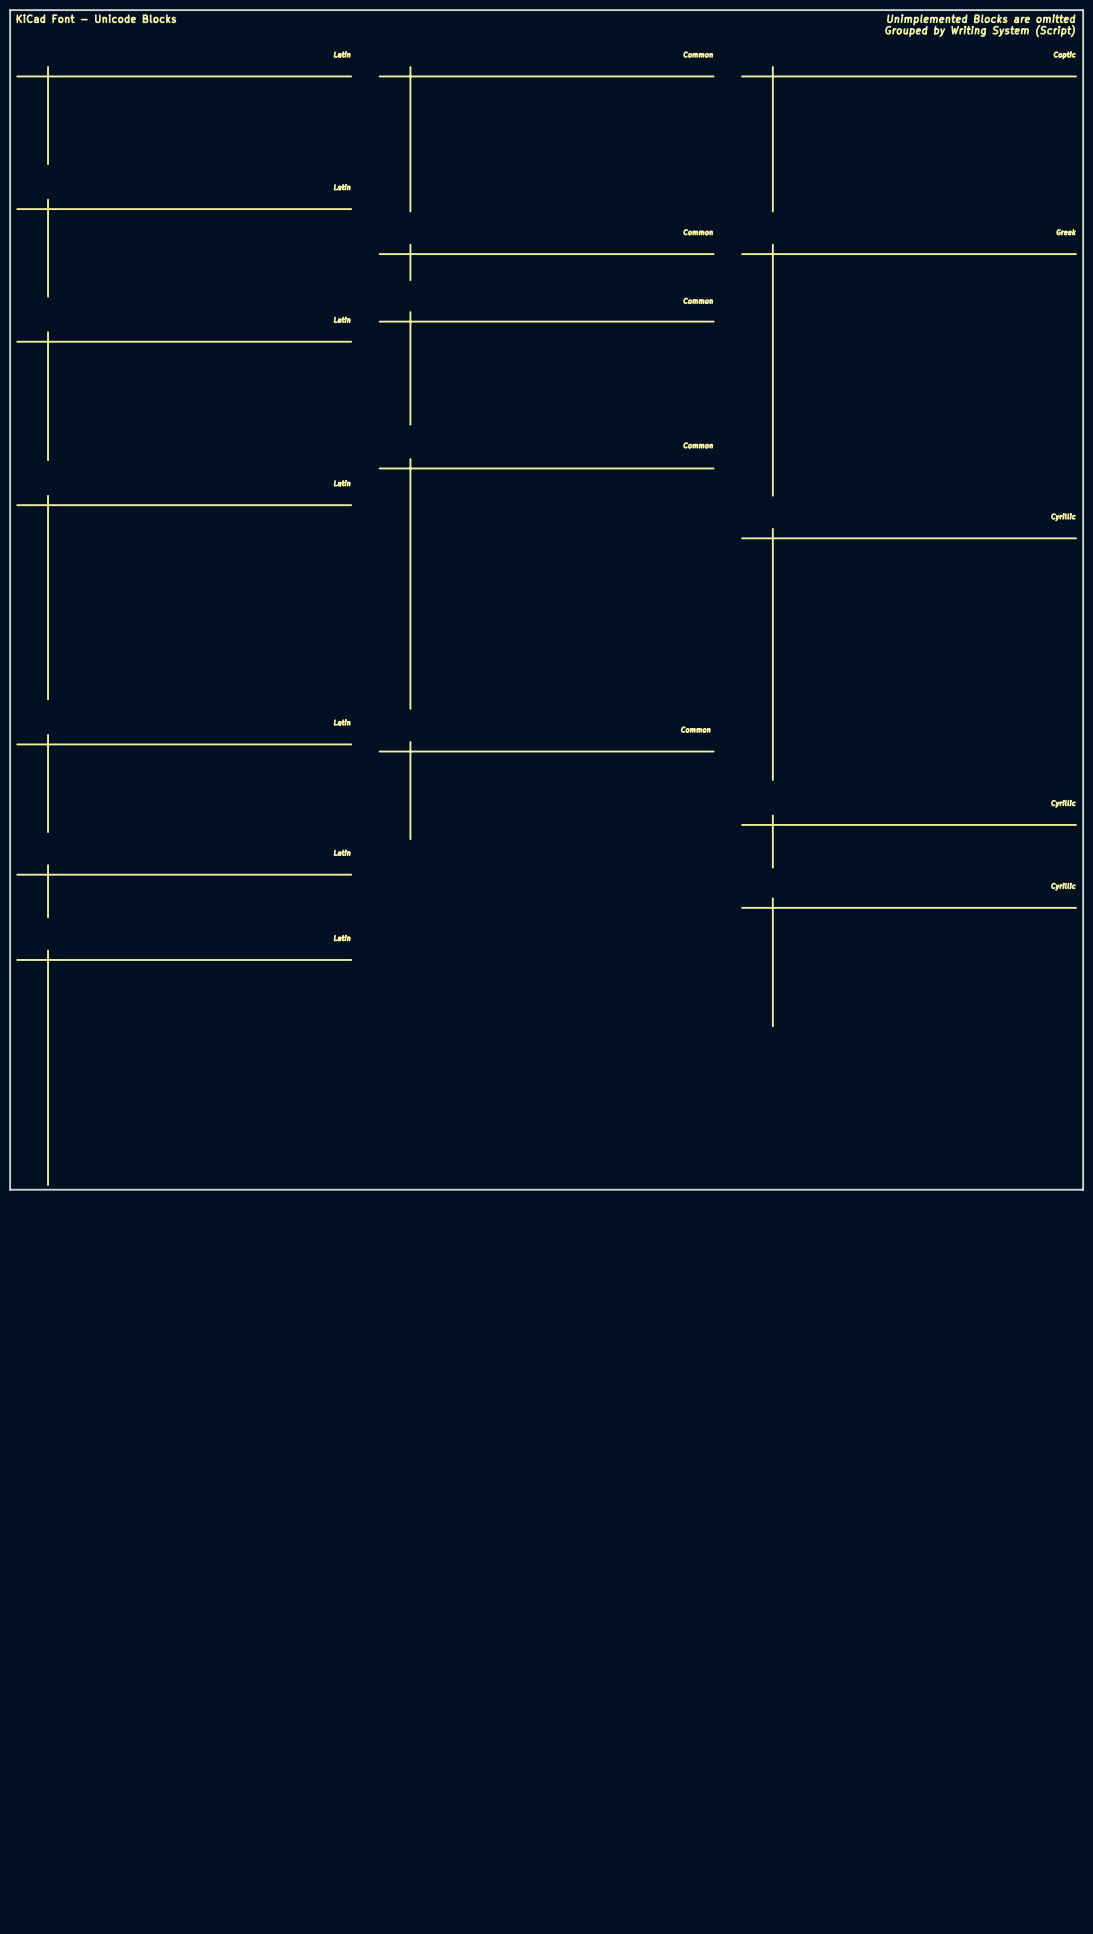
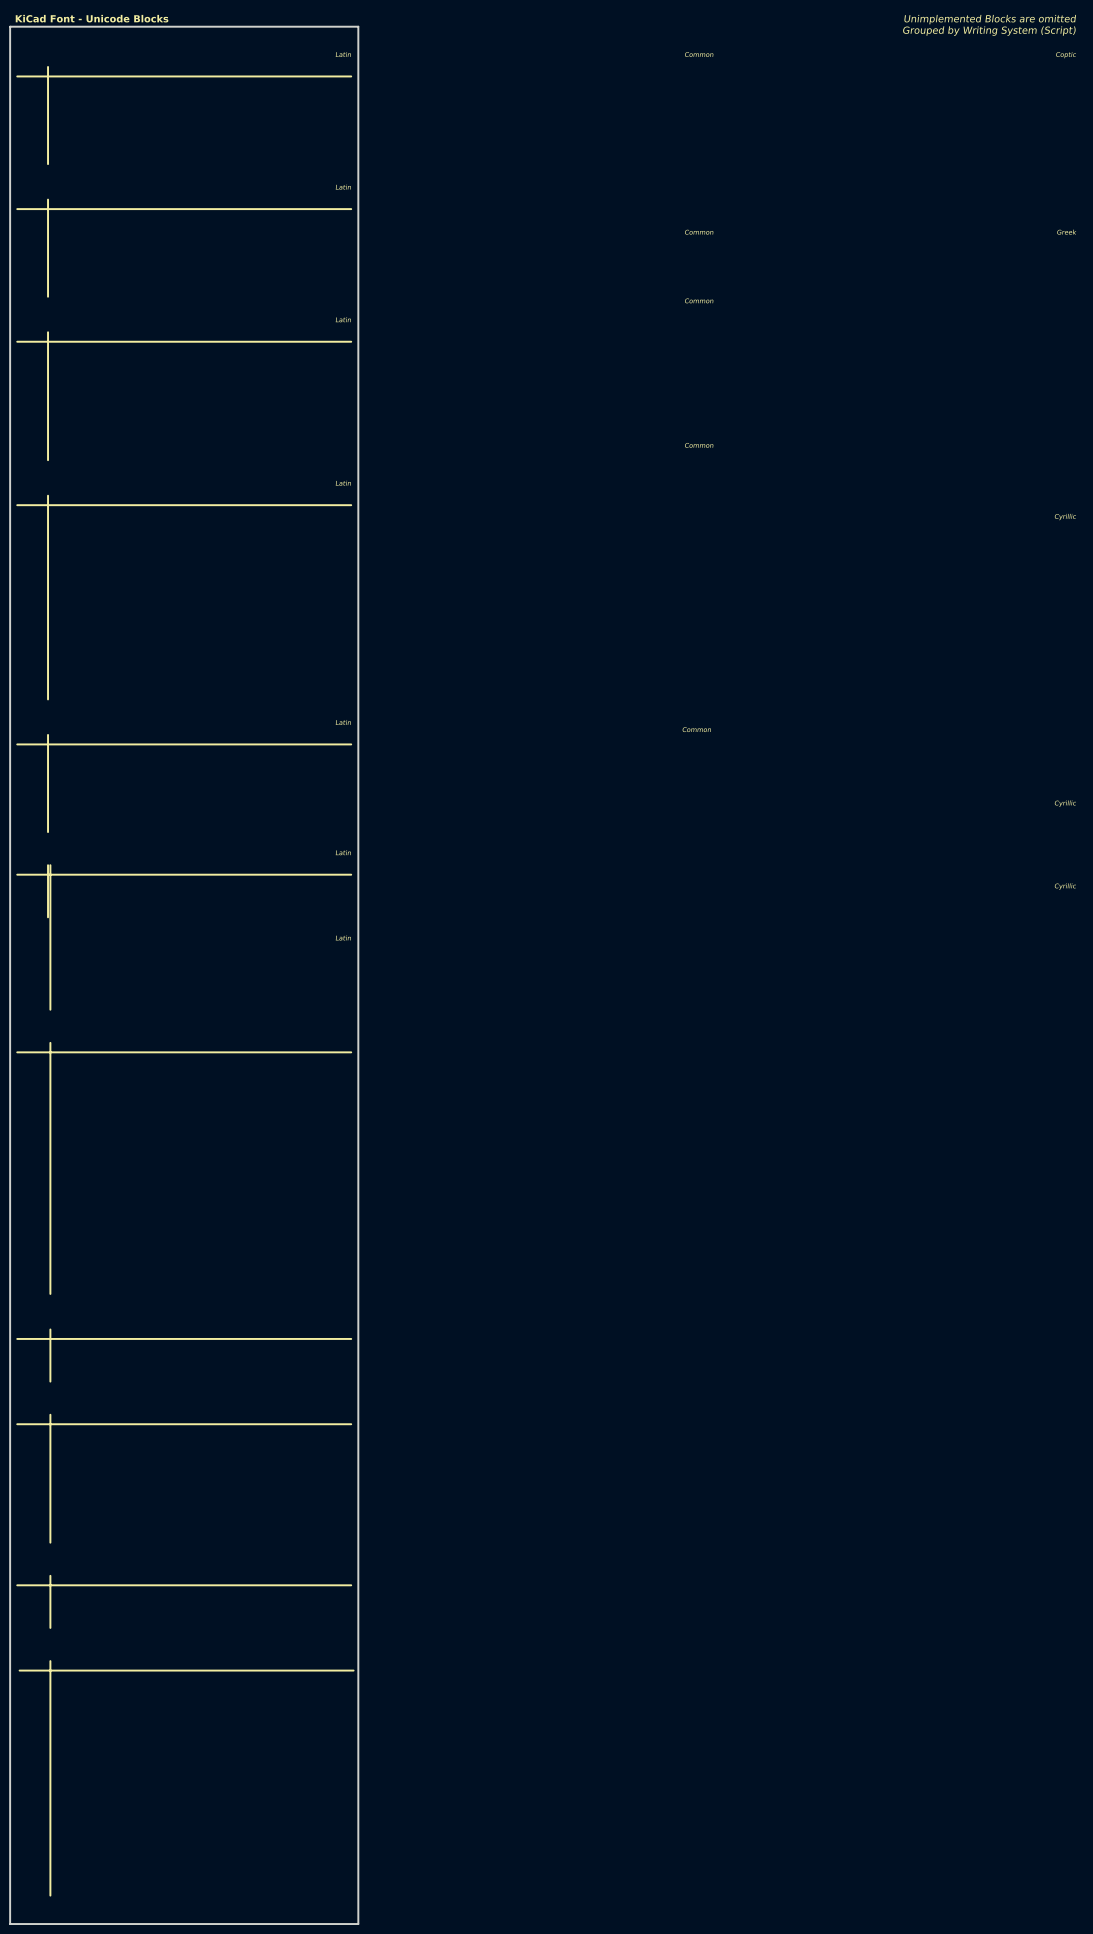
board edge: (10, 26) (10, 10) (1083, 10) (1083, 1189) (10, 1189) -> (10, 26) (358, 26) (358, 1924) (10, 1924) (10, 1189)
line: (410, 66) (410, 211) -> none
line: (772, 66) (772, 211) -> none
line: (379, 76) (713, 76) -> none
line: (742, 76) (1076, 76) -> none
line: (410, 244) (410, 280) -> none
line: (772, 244) (772, 495) -> none
line: (379, 254) (713, 254) -> none
line: (742, 254) (1076, 254) -> none
line: (410, 312) (410, 424) -> none
line: (379, 321) (713, 321) -> none
line: (410, 458) (410, 708) -> none
line: (379, 468) (713, 468) -> none
line: (772, 528) (772, 779) -> none
line: (742, 538) (1076, 538) -> none
line: (410, 742) (410, 839) -> none
line: (379, 751) (713, 751) -> none
line: (772, 815) (772, 867) -> none
line: (742, 824) (1076, 824) -> none
line: none -> (50, 865) (50, 1009)
line: (772, 898) (772, 1026) -> none
line: (742, 907) (1076, 907) -> none
line: (48, 950) (48, 1184) -> none
line: (17, 959) (351, 959) -> none
line: none -> (50, 1042) (50, 1293)
line: none -> (17, 1052) (351, 1052)
line: none -> (50, 1329) (50, 1381)
line: none -> (17, 1338) (351, 1338)
line: none -> (50, 1414) (50, 1542)
line: none -> (17, 1424) (351, 1424)
line: none -> (50, 1575) (50, 1627)
line: none -> (17, 1585) (351, 1585)
line: none -> (50, 1661) (50, 1895)
line: none -> (19, 1670) (353, 1670)

